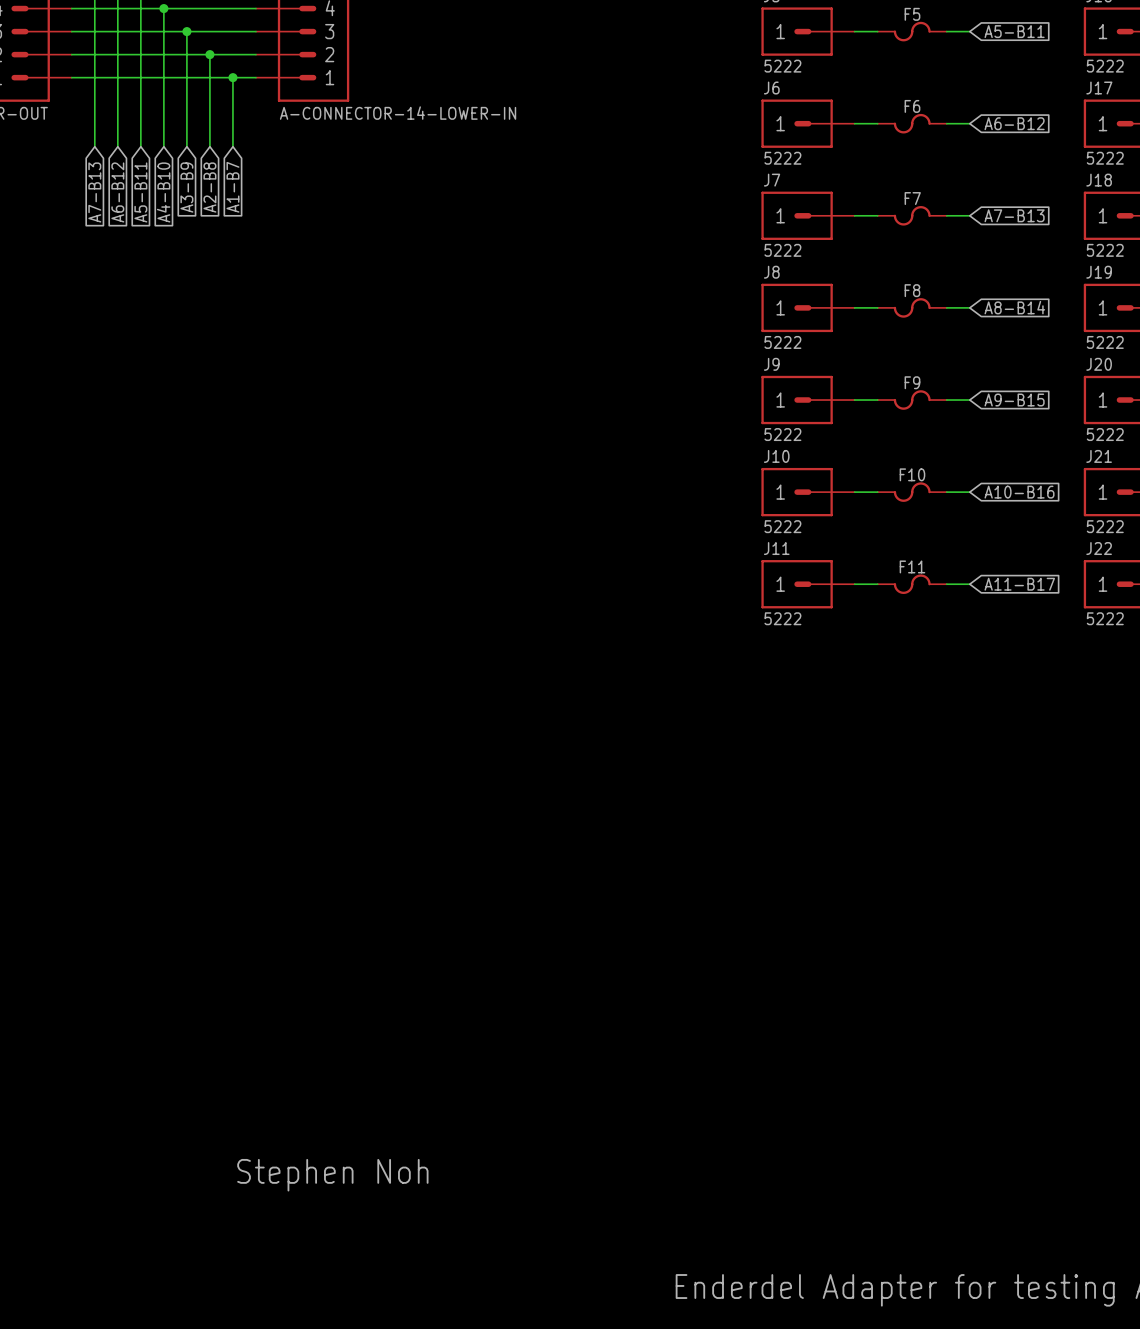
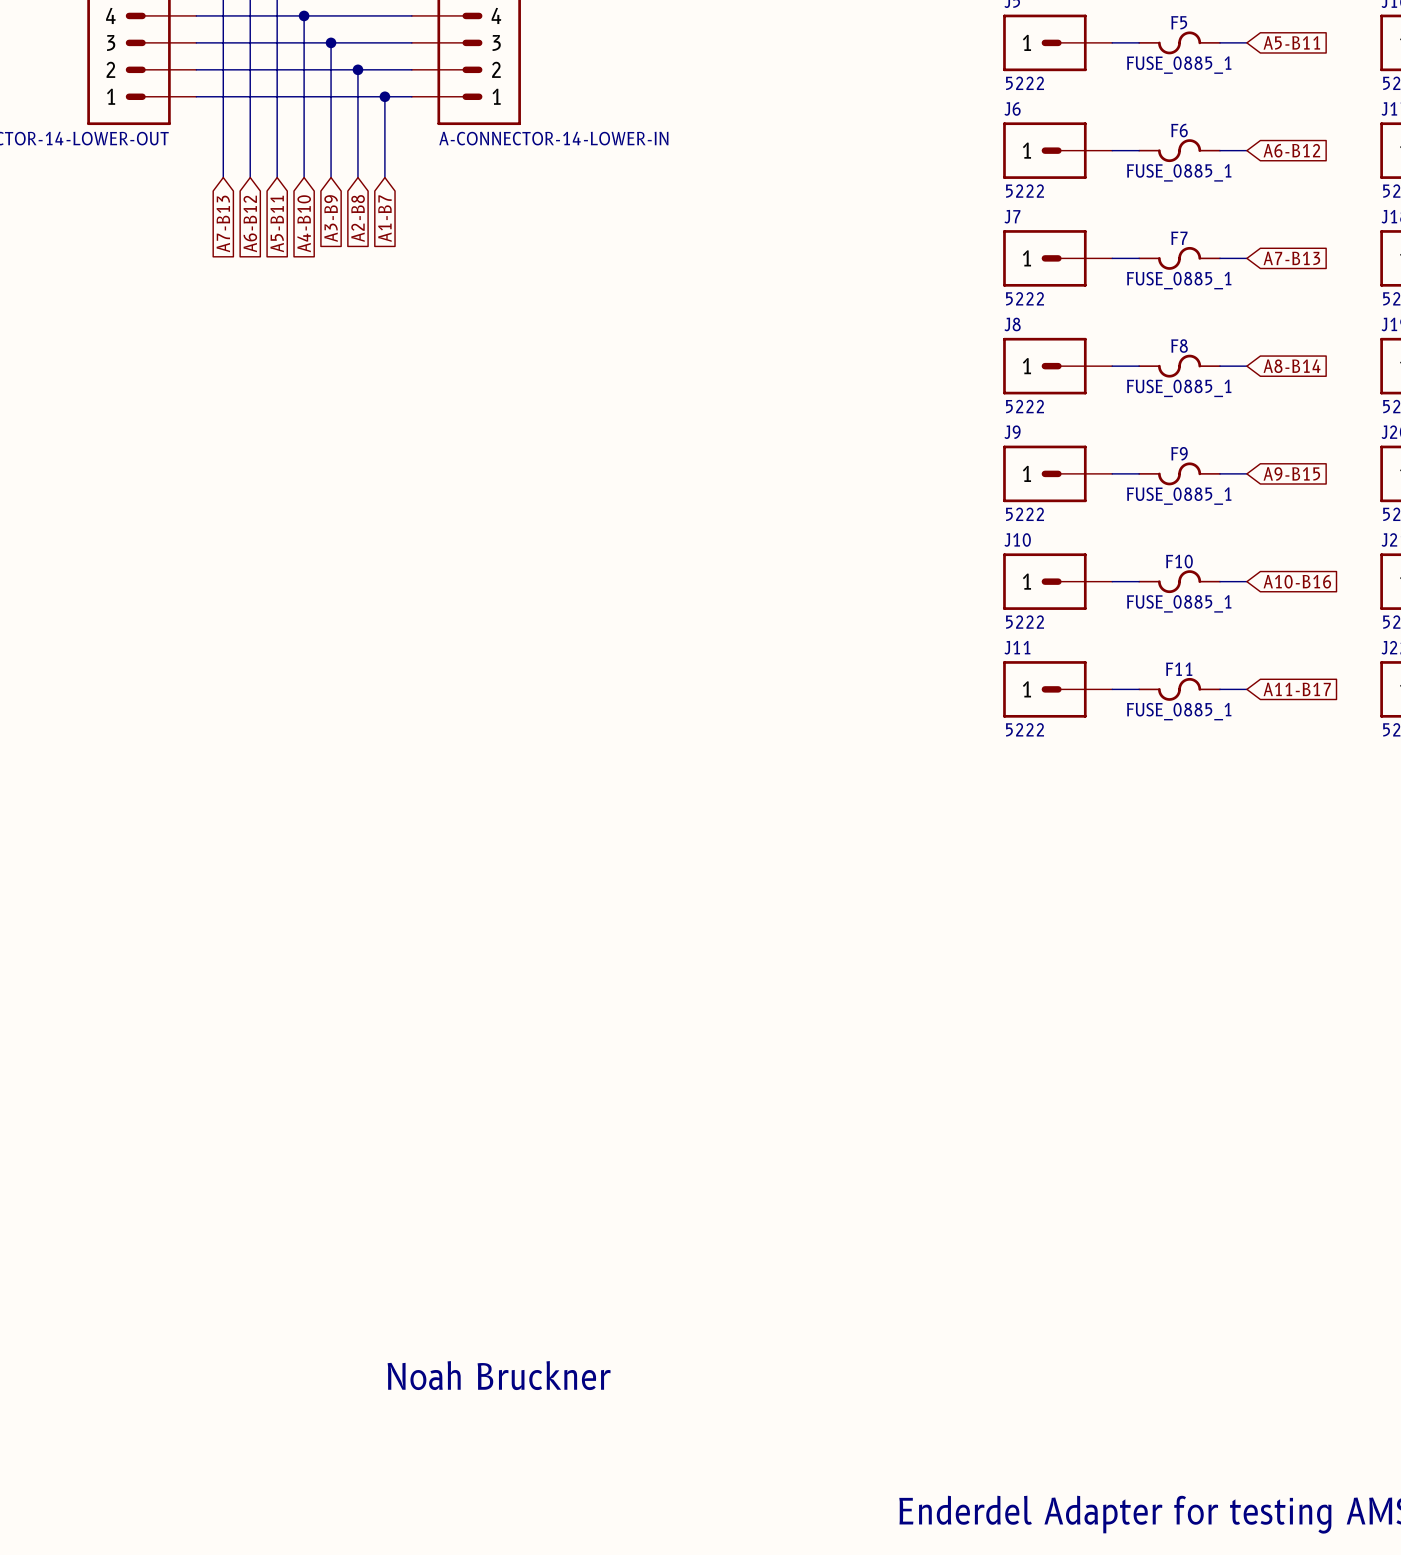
F5 value: none -> FUSE_0885_1 (1179, 65)
F6 value: none -> FUSE_0885_1 (1179, 172)
F7 value: none -> FUSE_0885_1 (1179, 280)
F8 value: none -> FUSE_0885_1 (1179, 388)
F9 value: none -> FUSE_0885_1 (1179, 496)
F10 value: none -> FUSE_0885_1 (1179, 603)
F11 value: none -> FUSE_0885_1 (1179, 711)
text: Stephen Noh (332, 1175) -> Noah Bruckner (499, 1375)

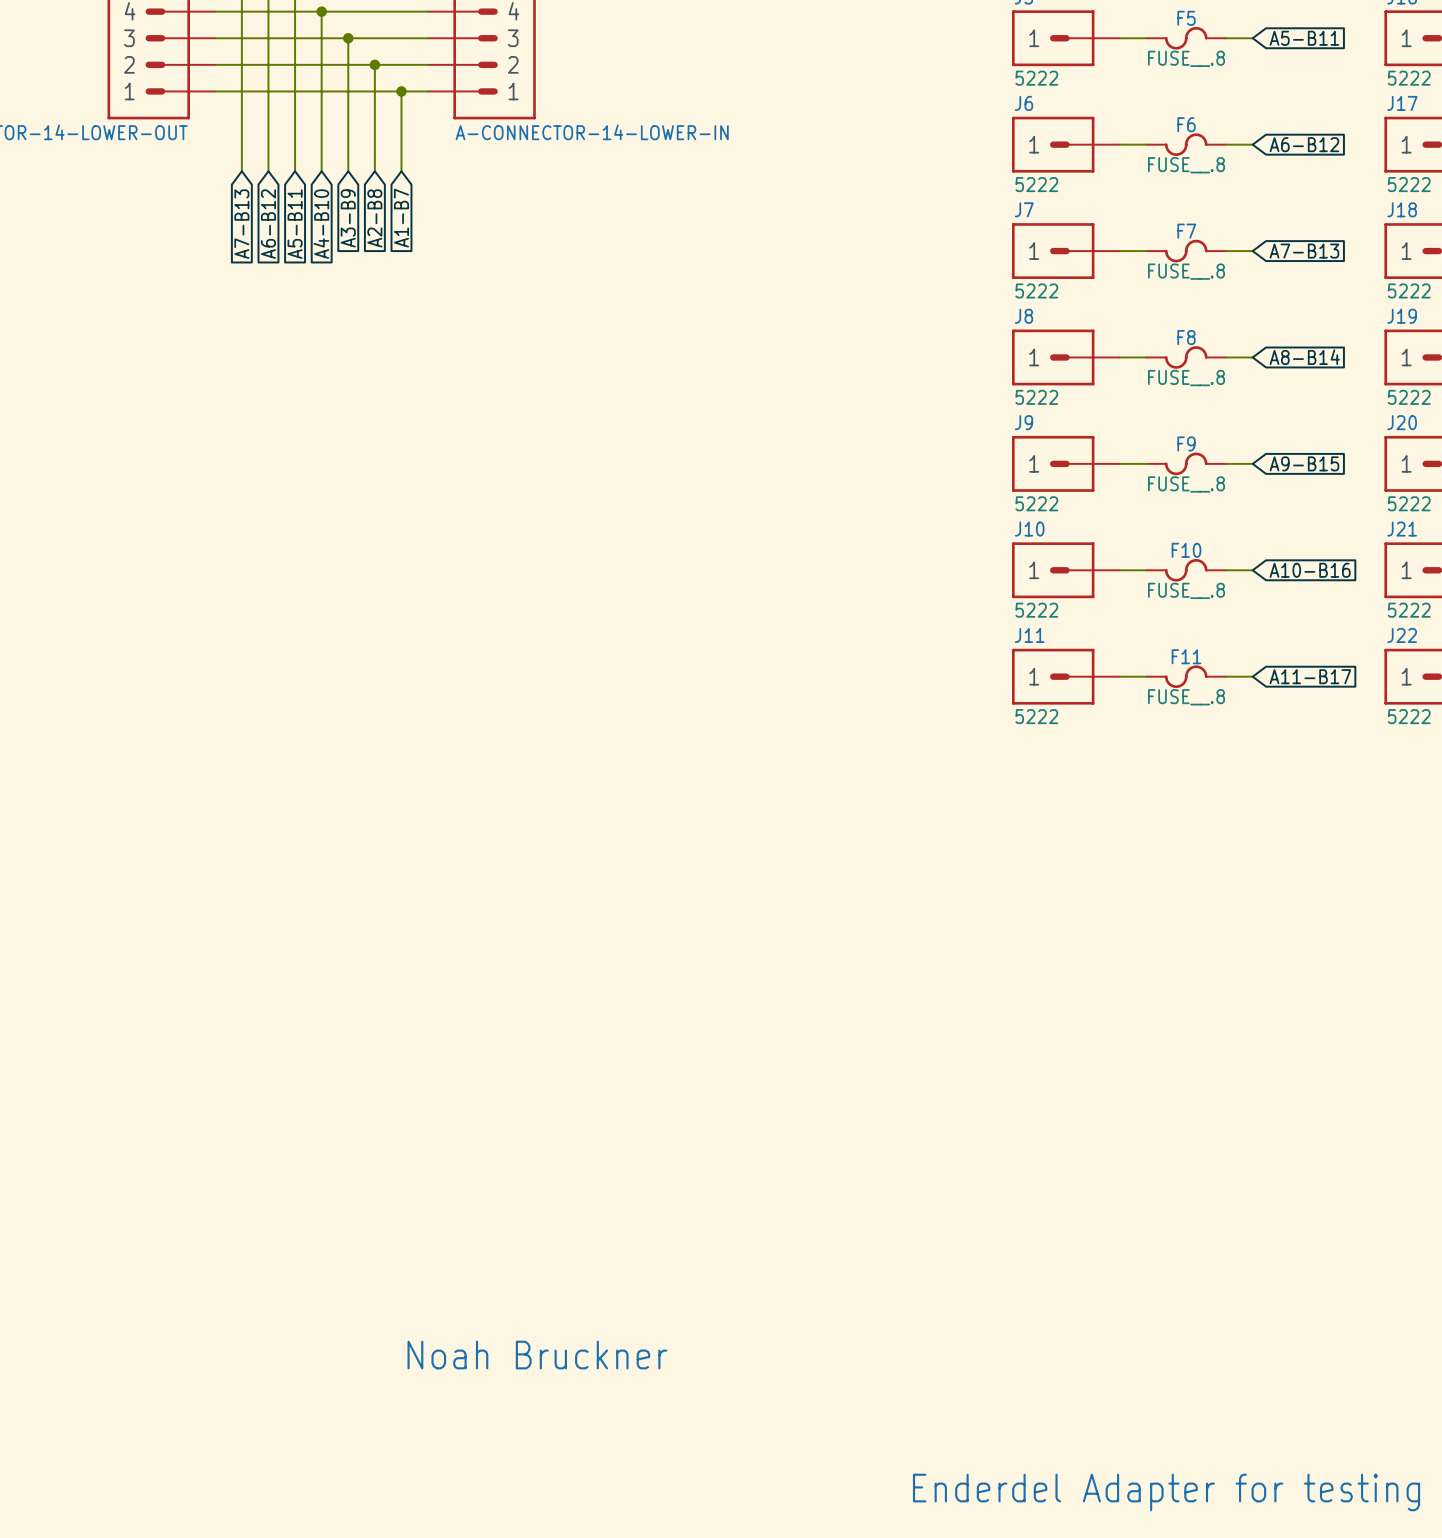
F5 value: FUSE_0885_1 (1179, 65) -> FUSE__.8 (1186, 58)
F6 value: FUSE_0885_1 (1179, 172) -> FUSE__.8 (1186, 165)
F7 value: FUSE_0885_1 (1179, 280) -> FUSE__.8 (1186, 271)
F8 value: FUSE_0885_1 (1179, 388) -> FUSE__.8 (1186, 378)
F9 value: FUSE_0885_1 (1179, 496) -> FUSE__.8 (1186, 484)
F10 value: FUSE_0885_1 (1179, 603) -> FUSE__.8 (1186, 590)
F11 value: FUSE_0885_1 (1179, 711) -> FUSE__.8 (1186, 697)

